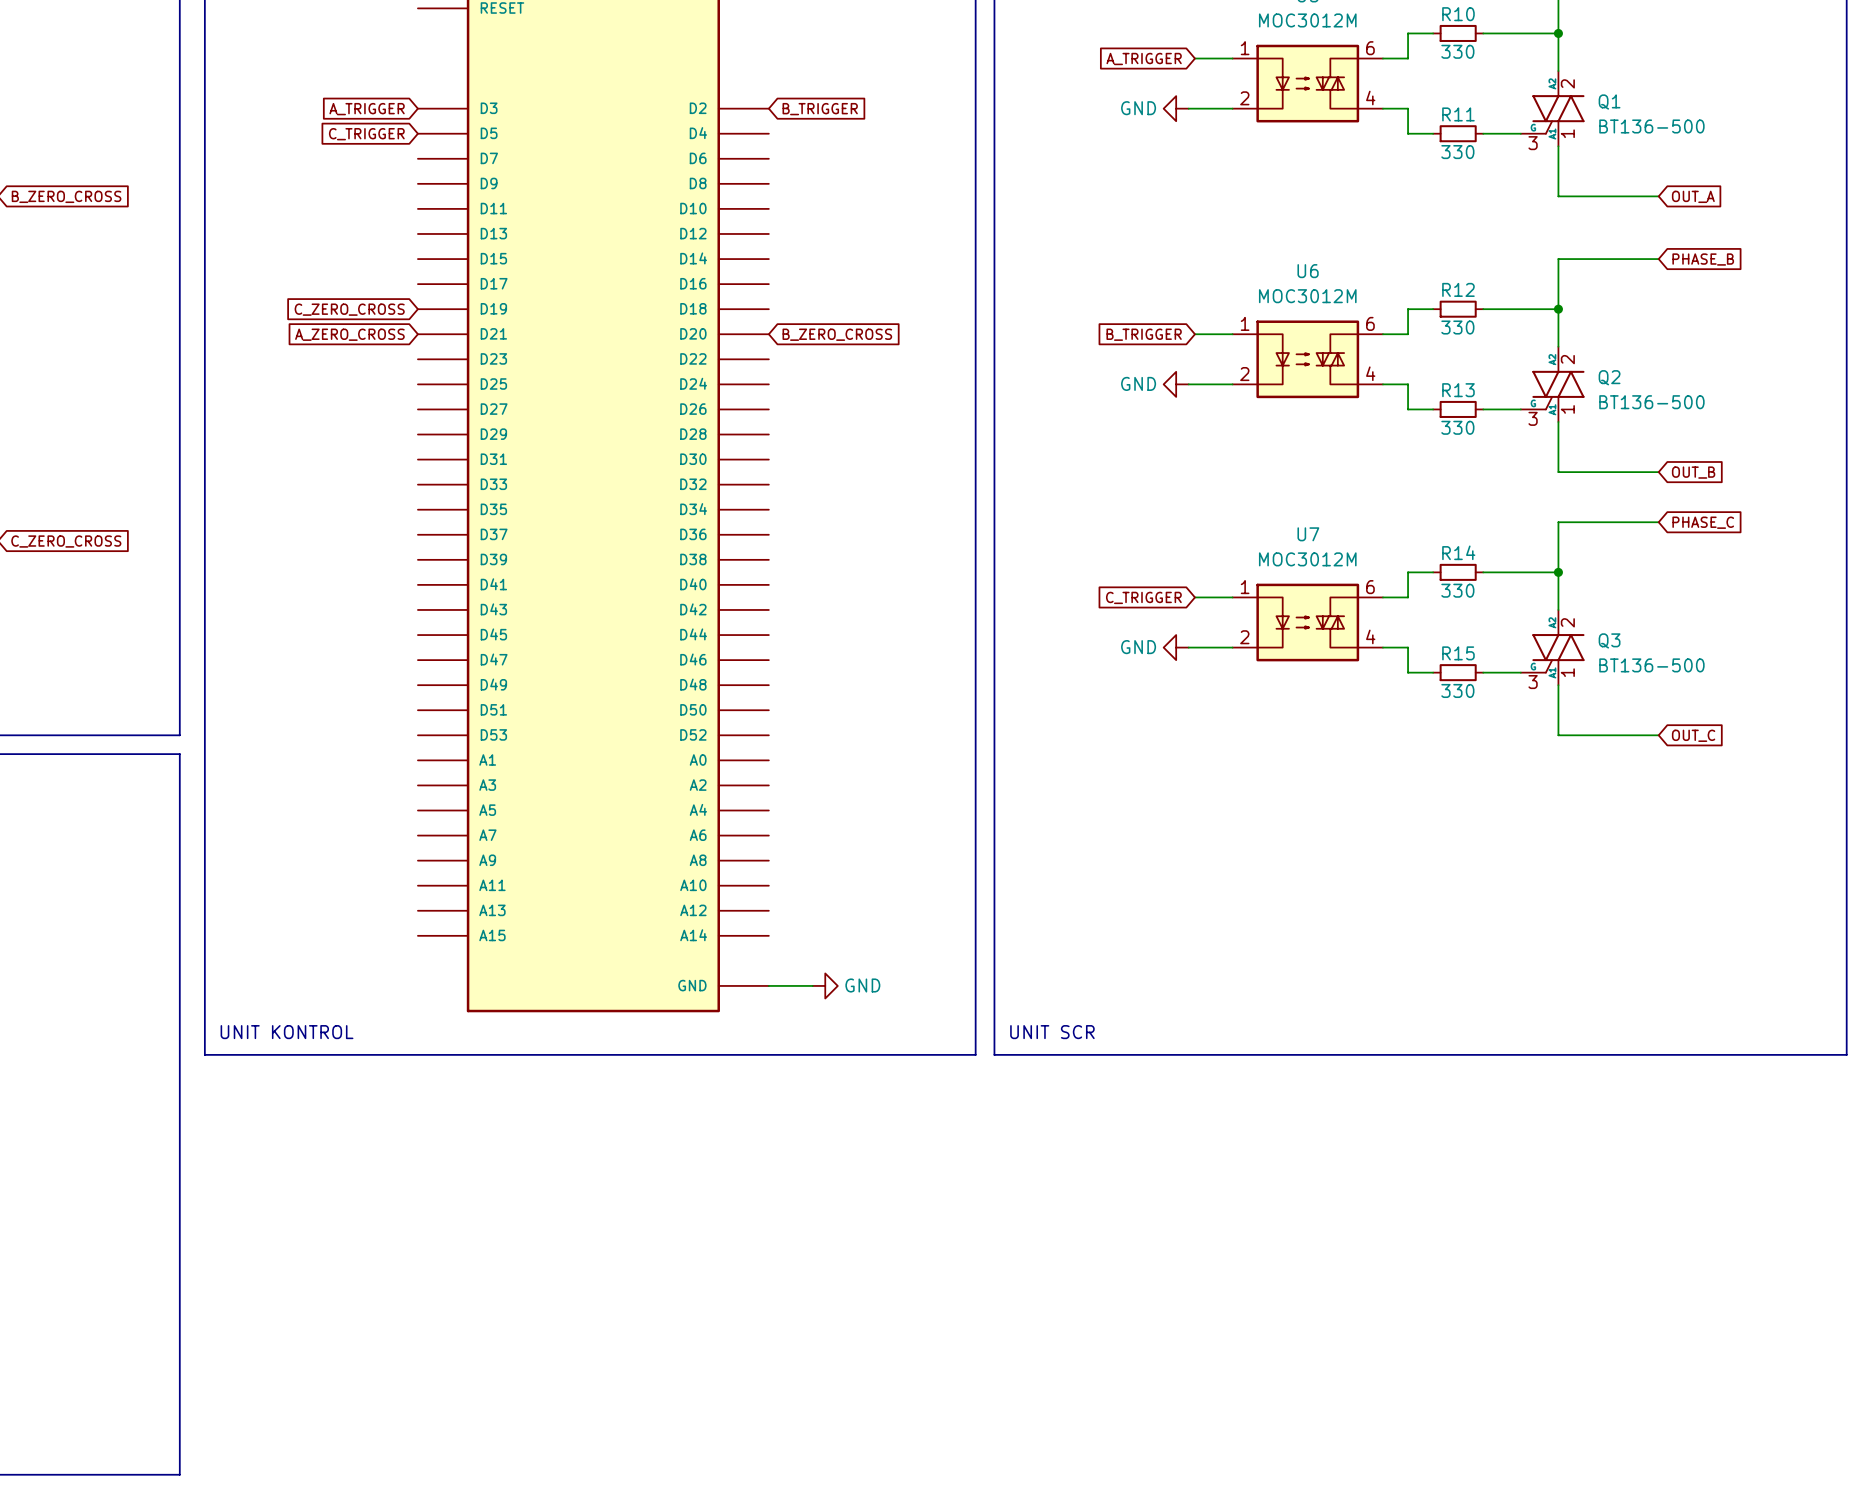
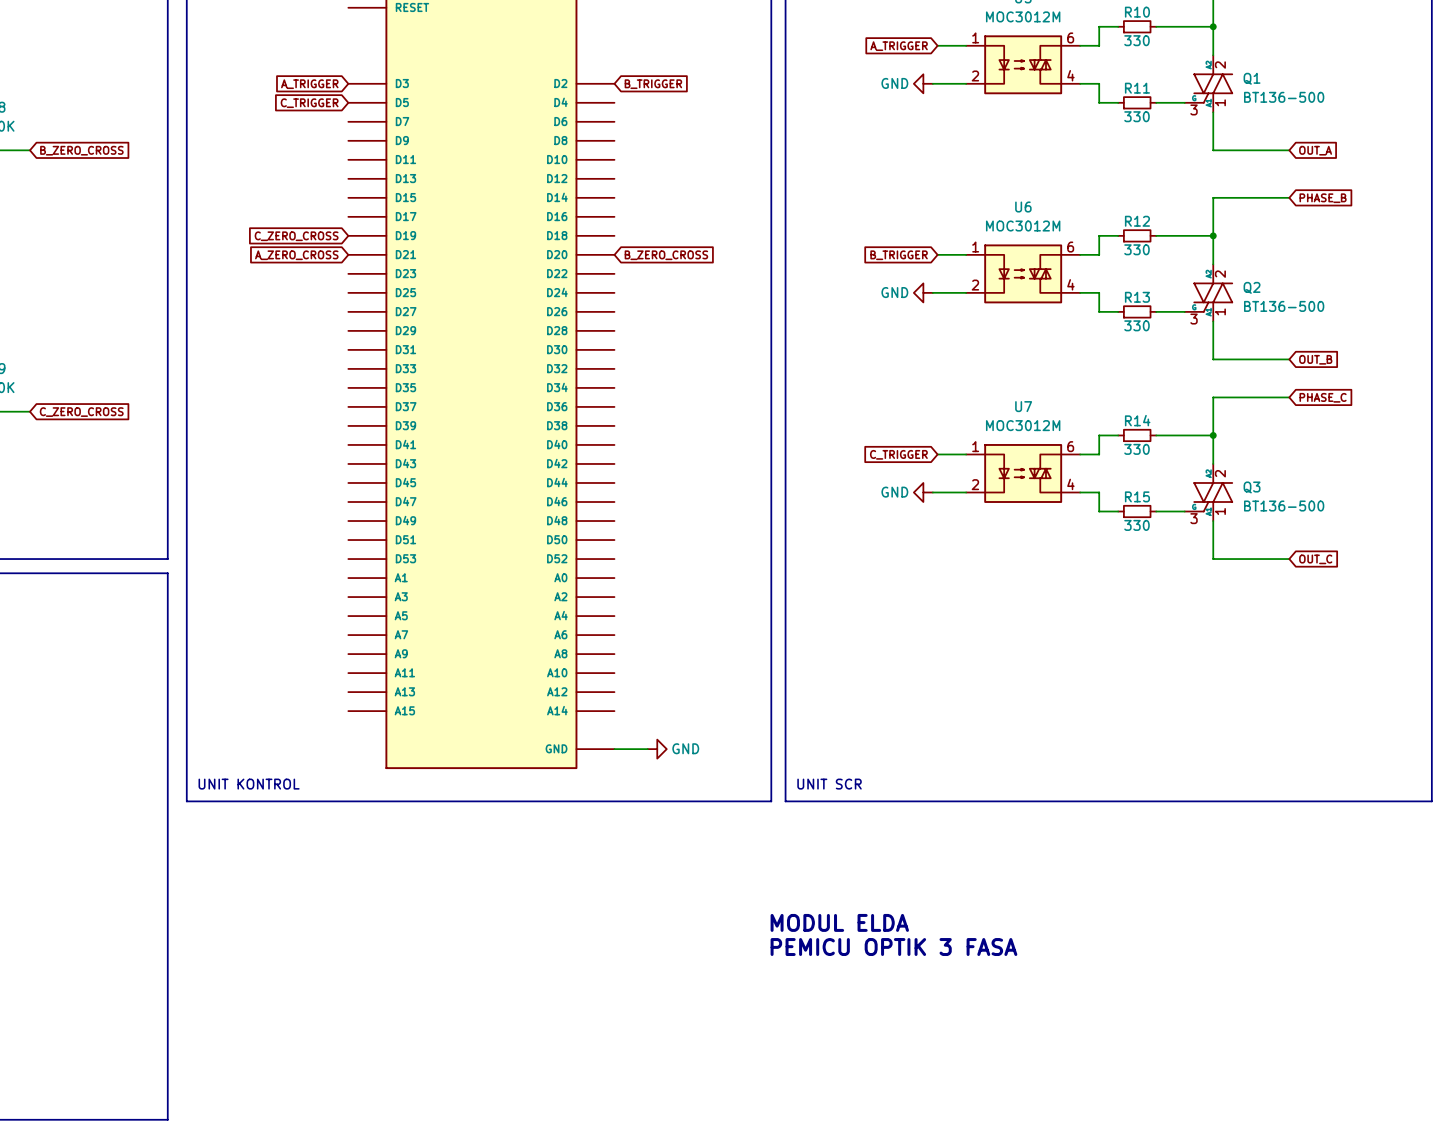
text: none -> MODUL ELDA (839, 922)
text: none -> PEMICU OPTIK 3 FASA (893, 947)

